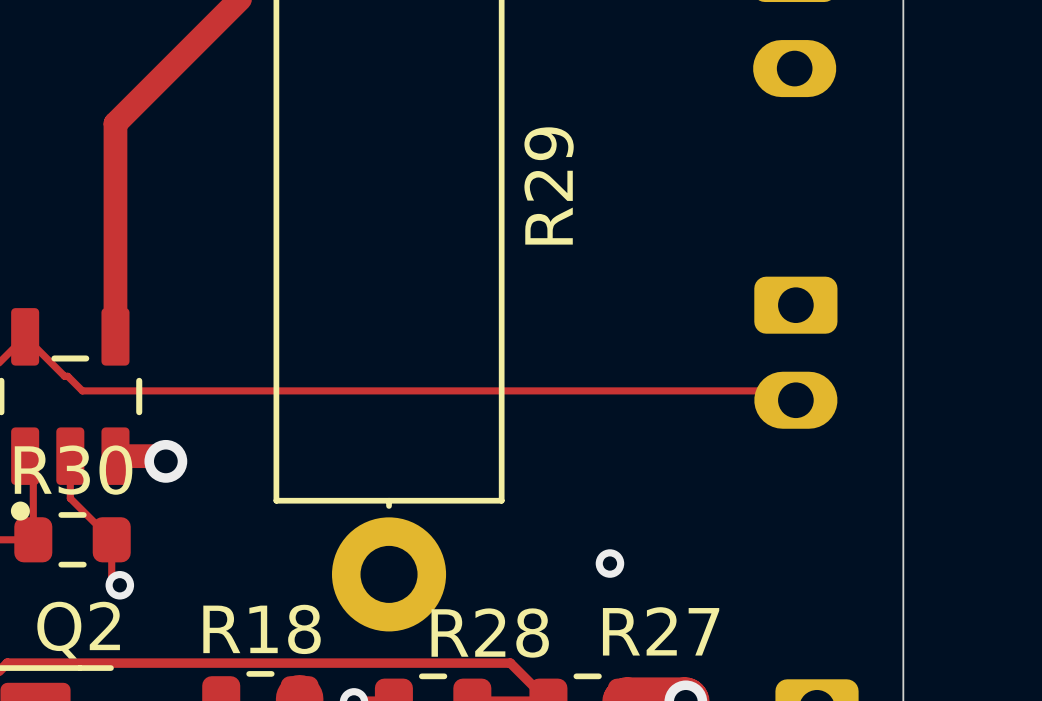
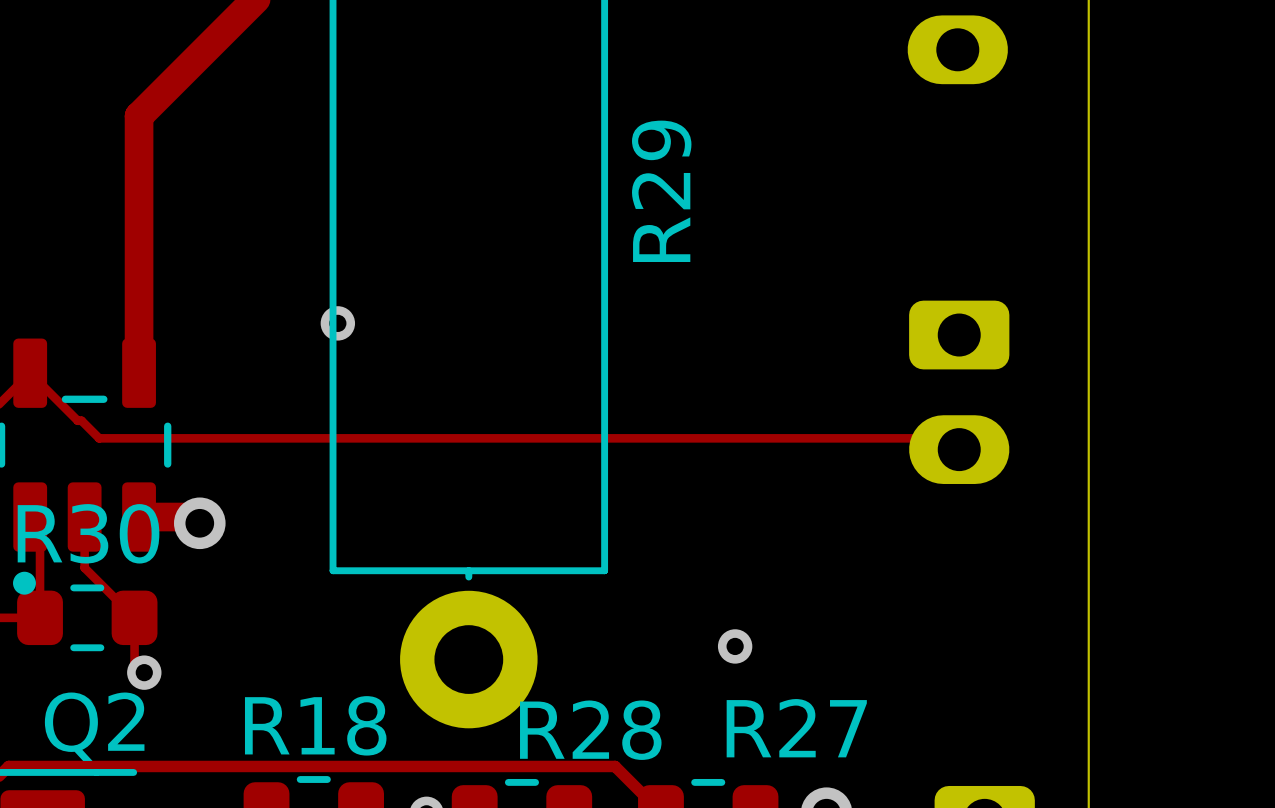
via: none -> (337, 323)

